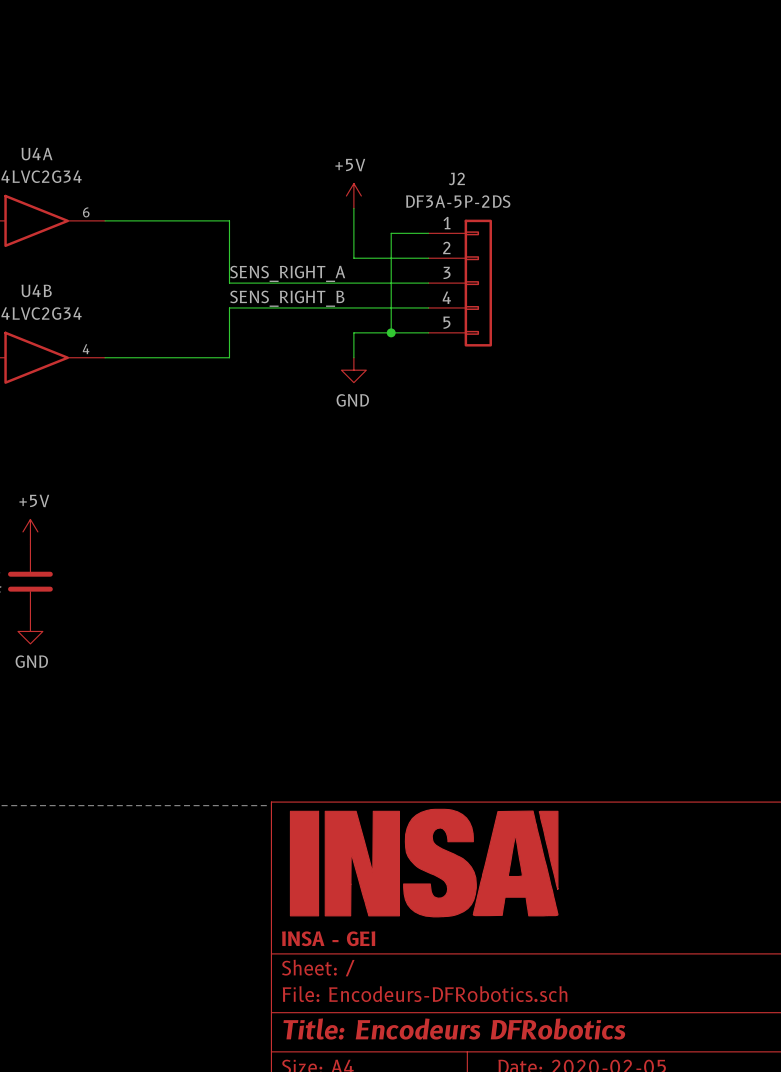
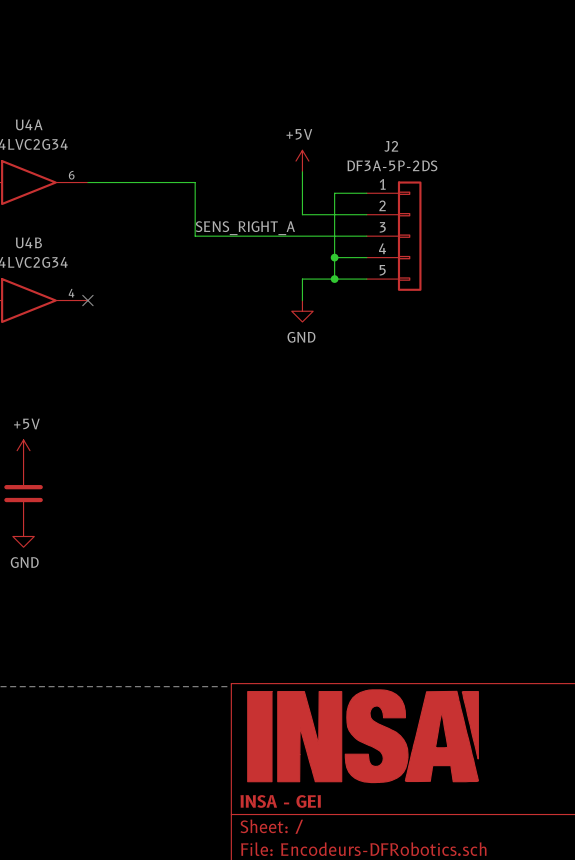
label: SENS_RIGHT_B (287, 298) -> none
wire: (391, 307) (229, 307) (229, 357) (105, 357) -> none
junction: none -> (334, 257)
no-connect mark: none -> (87, 300)

